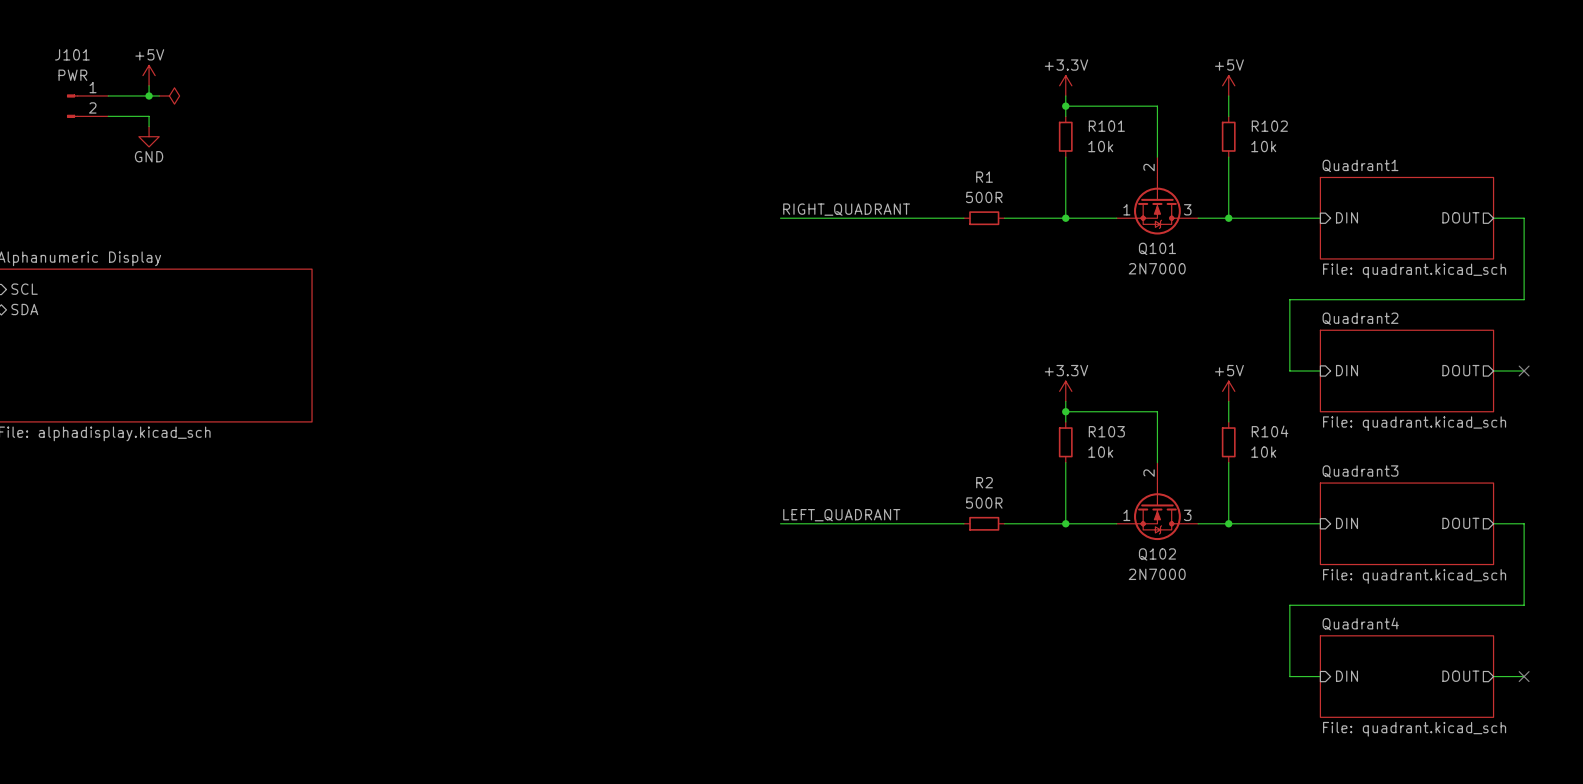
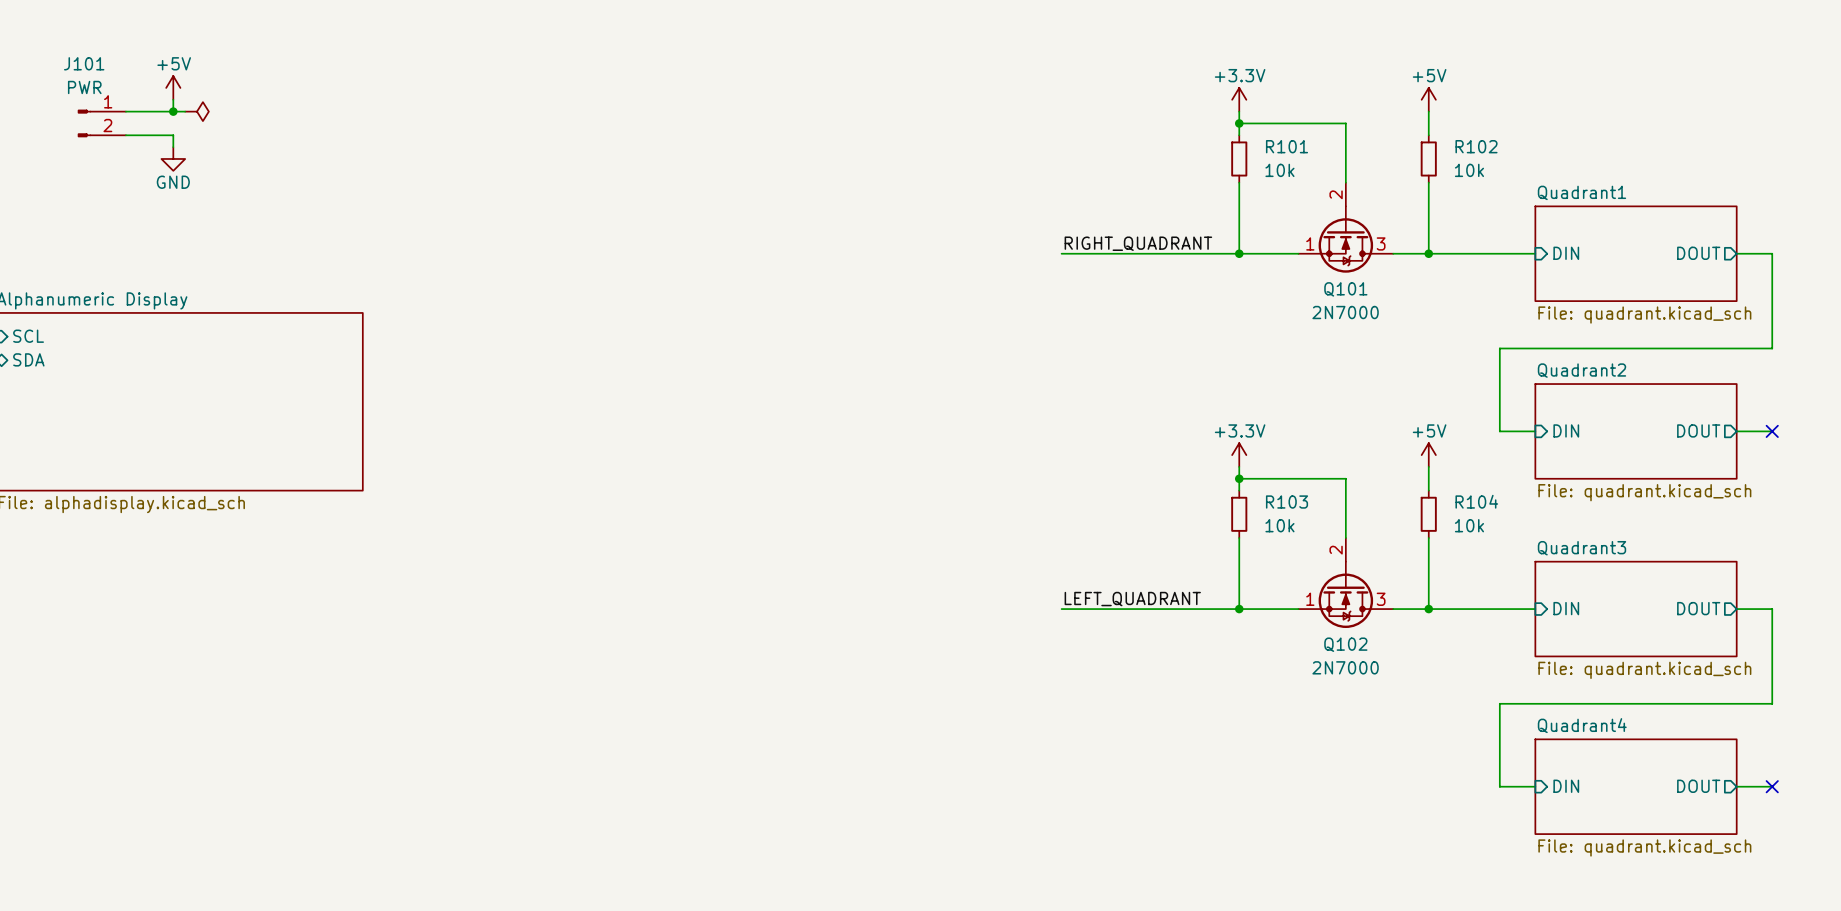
label position: RIGHT_QUADRANT (846, 209) -> RIGHT_QUADRANT (1138, 243)
wire: (780, 218) (912, 218) -> none
wire: none -> (1120, 253) (1168, 253)
R1: 500R (984, 218) -> none
label position: LEFT_QUADRANT (841, 515) -> LEFT_QUADRANT (1132, 599)
wire: (780, 523) (912, 523) -> none
wire: none -> (1120, 609) (1168, 609)
R2: 500R (984, 523) -> none

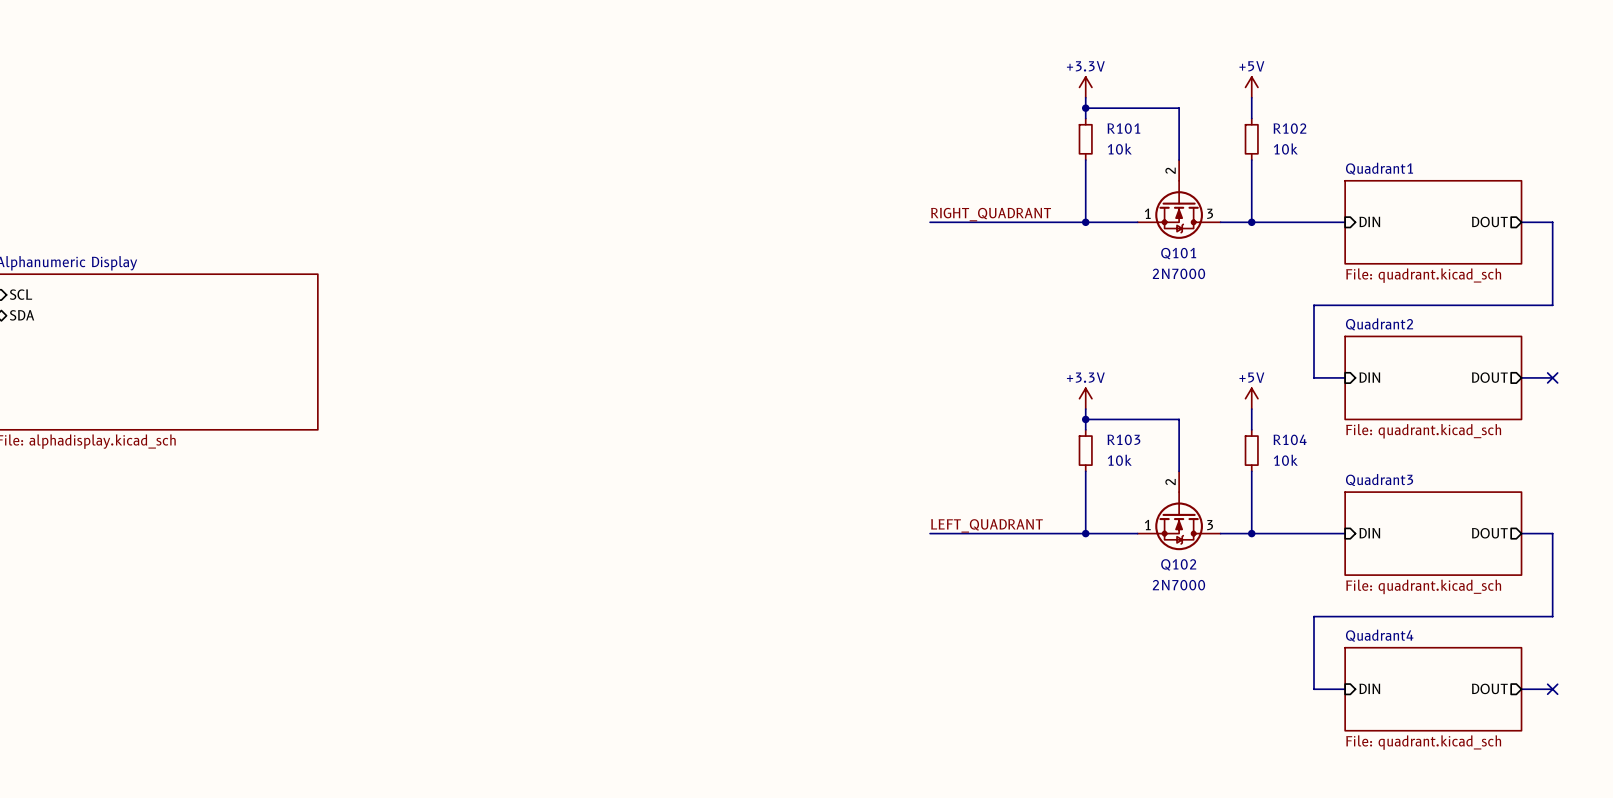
power symbol: +5V (173, 87) -> none
wire: (173, 99) (173, 111) -> none
wire: (125, 111) (185, 111) -> none
junction: (173, 111) -> none
power symbol: (197, 111) -> none
J101: PWR (101, 123) -> none
wire: (125, 135) (173, 135) (173, 147) -> none
power symbol: GND (173, 158) -> none

